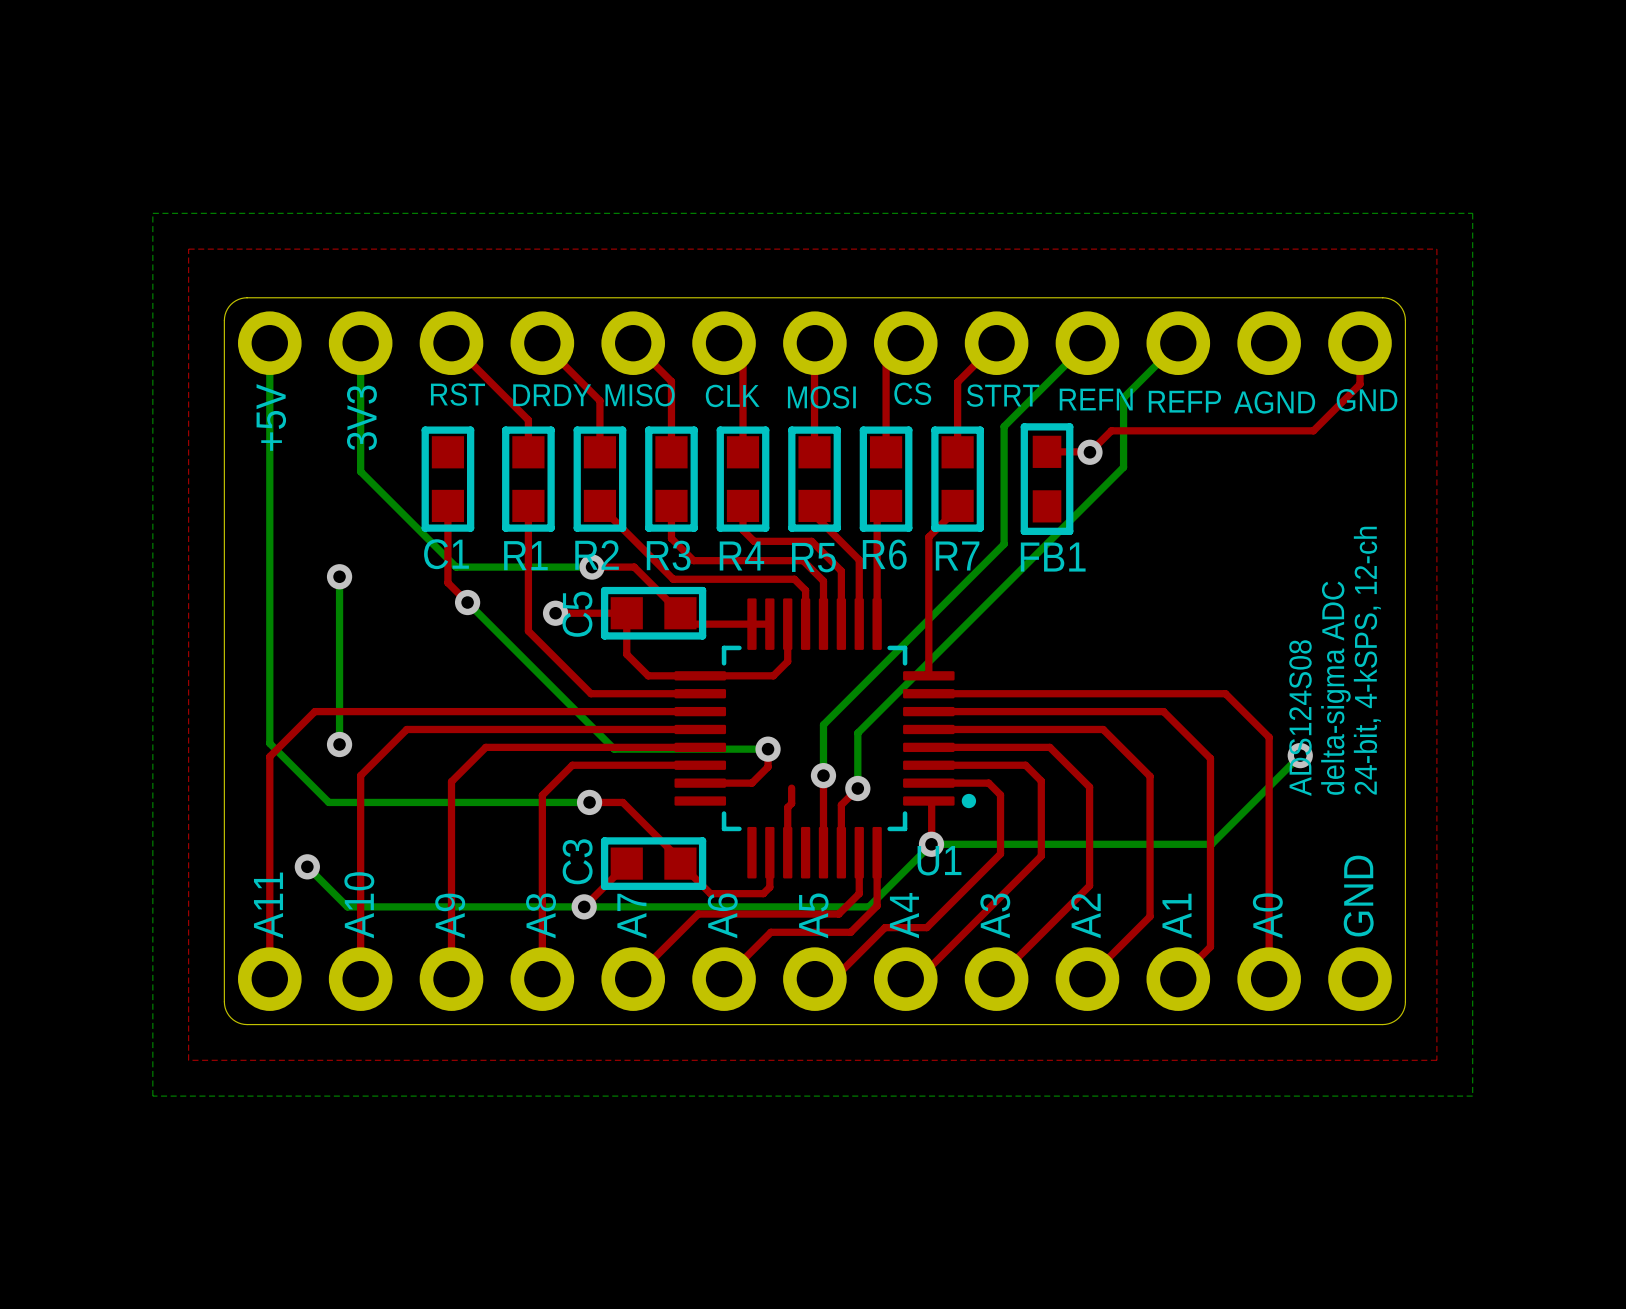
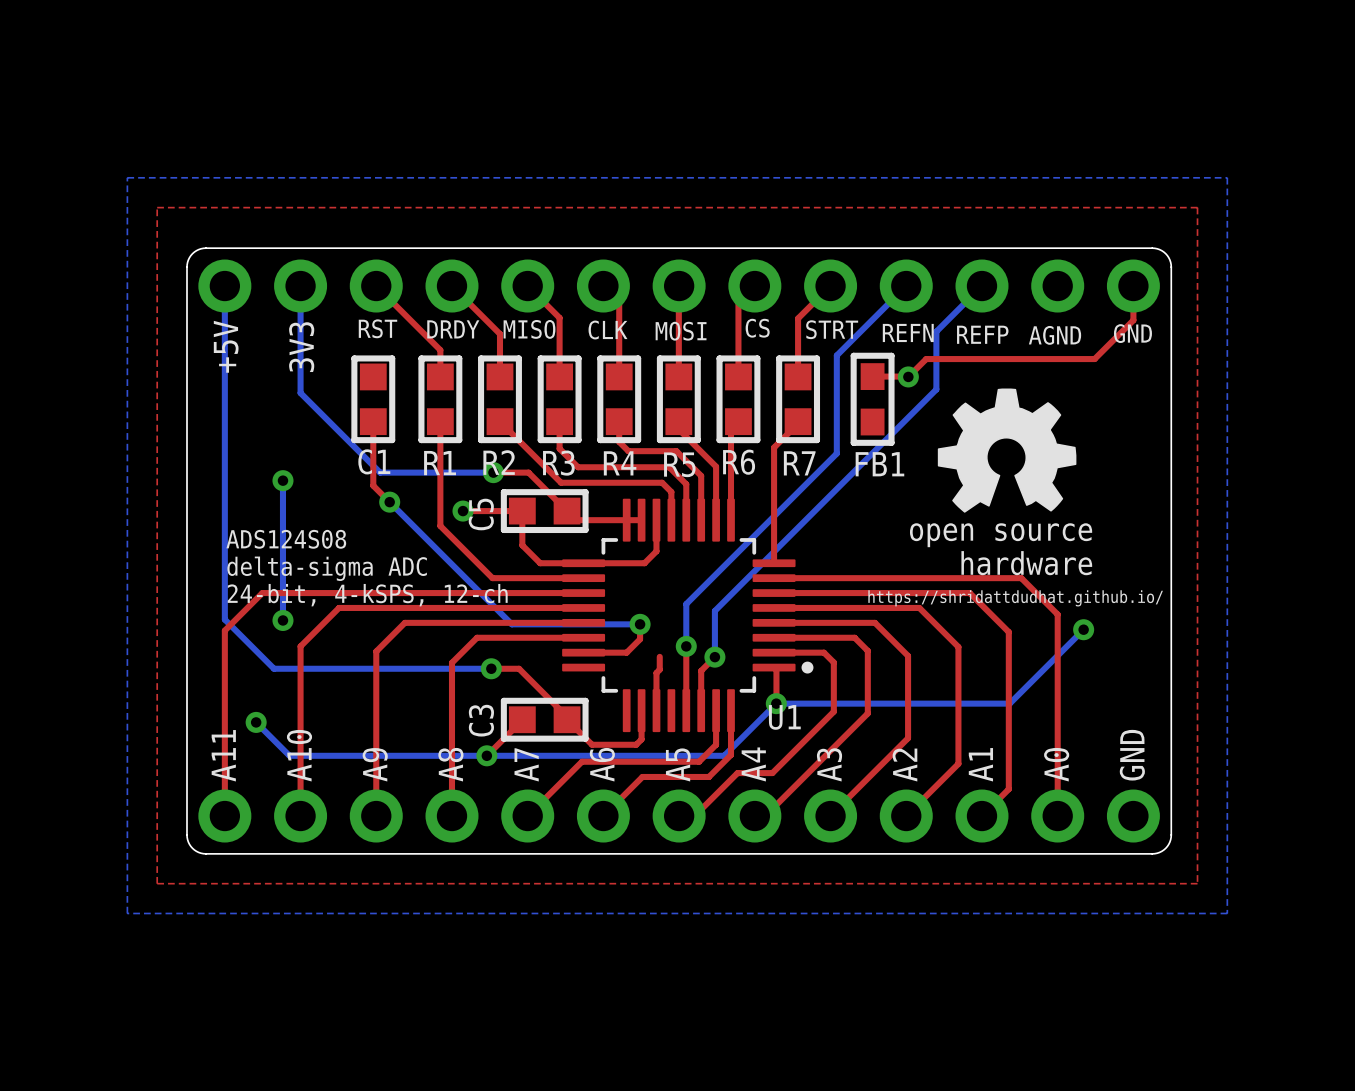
drawing: none -> [937, 388, 1077, 513]
text: none -> ADS124S08 (286, 539)
text: 24-bit, 4-kSPS, 12-ch (1367, 660) -> none
text: none -> delta-sigma ADC (327, 568)
text: delta-sigma ADC (1335, 688) -> none
text: none -> 24-bit, 4-kSPS, 12-ch (367, 595)
text: none -> https://shridattdudhat.github.io/ (1015, 598)
text: ADS124S08 (1300, 718) -> none

